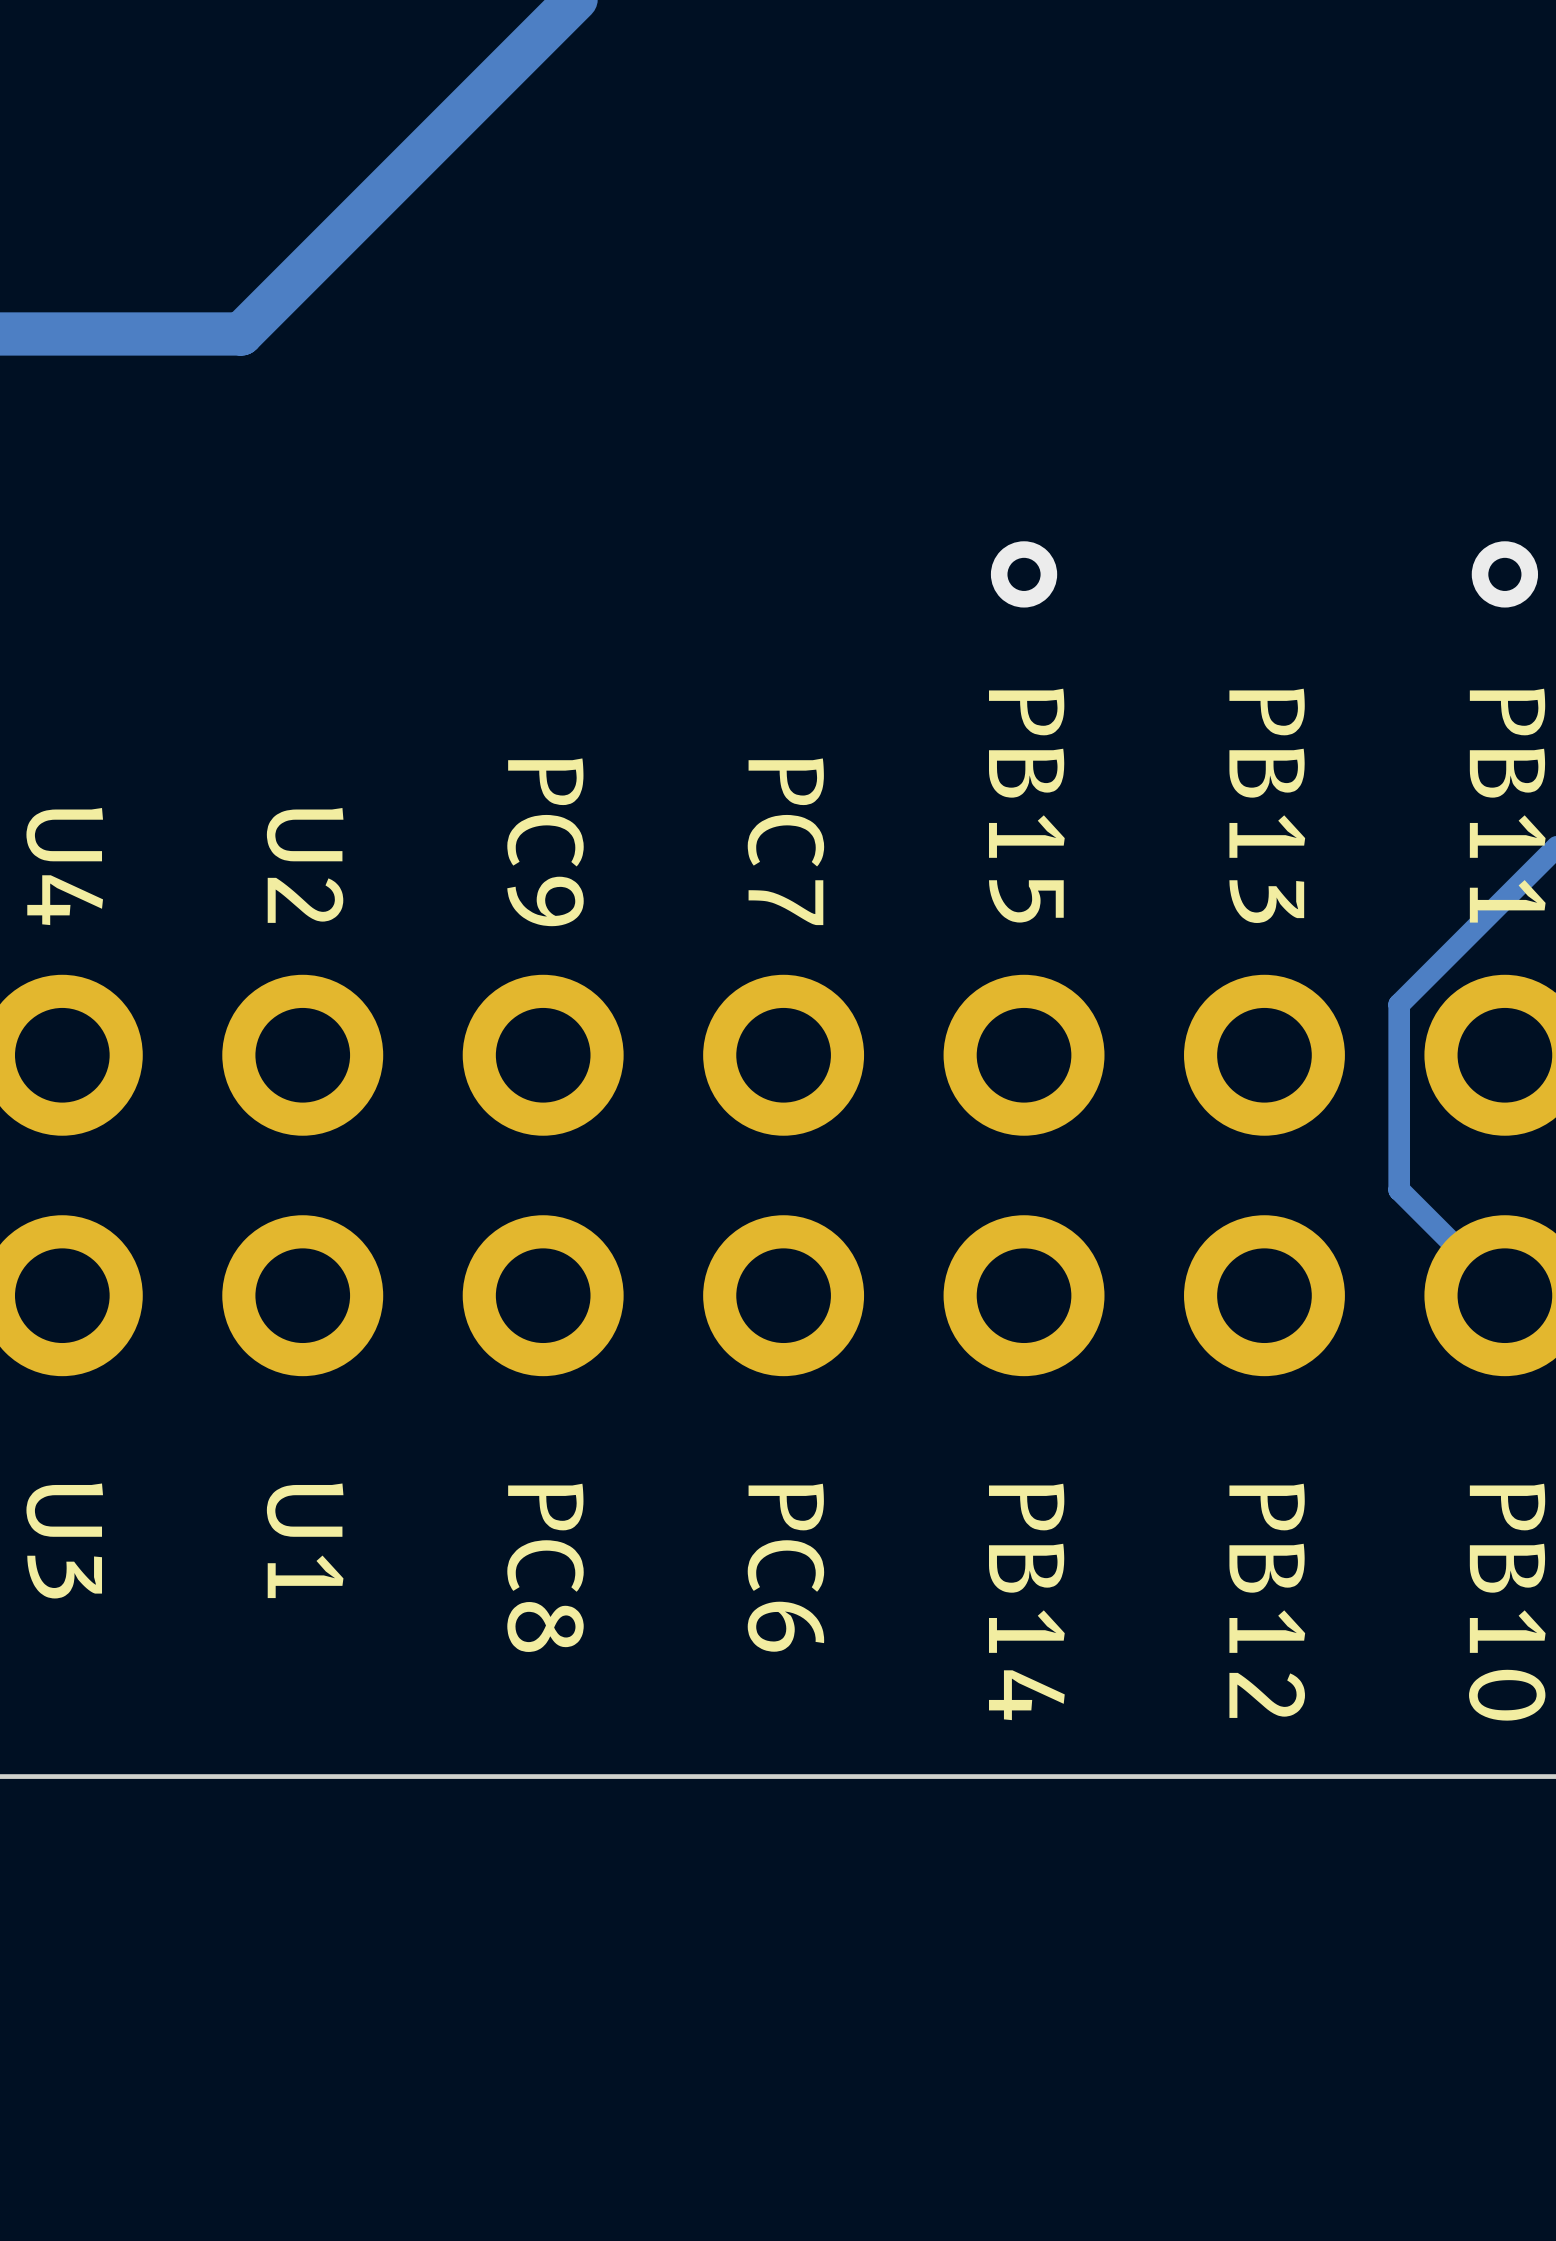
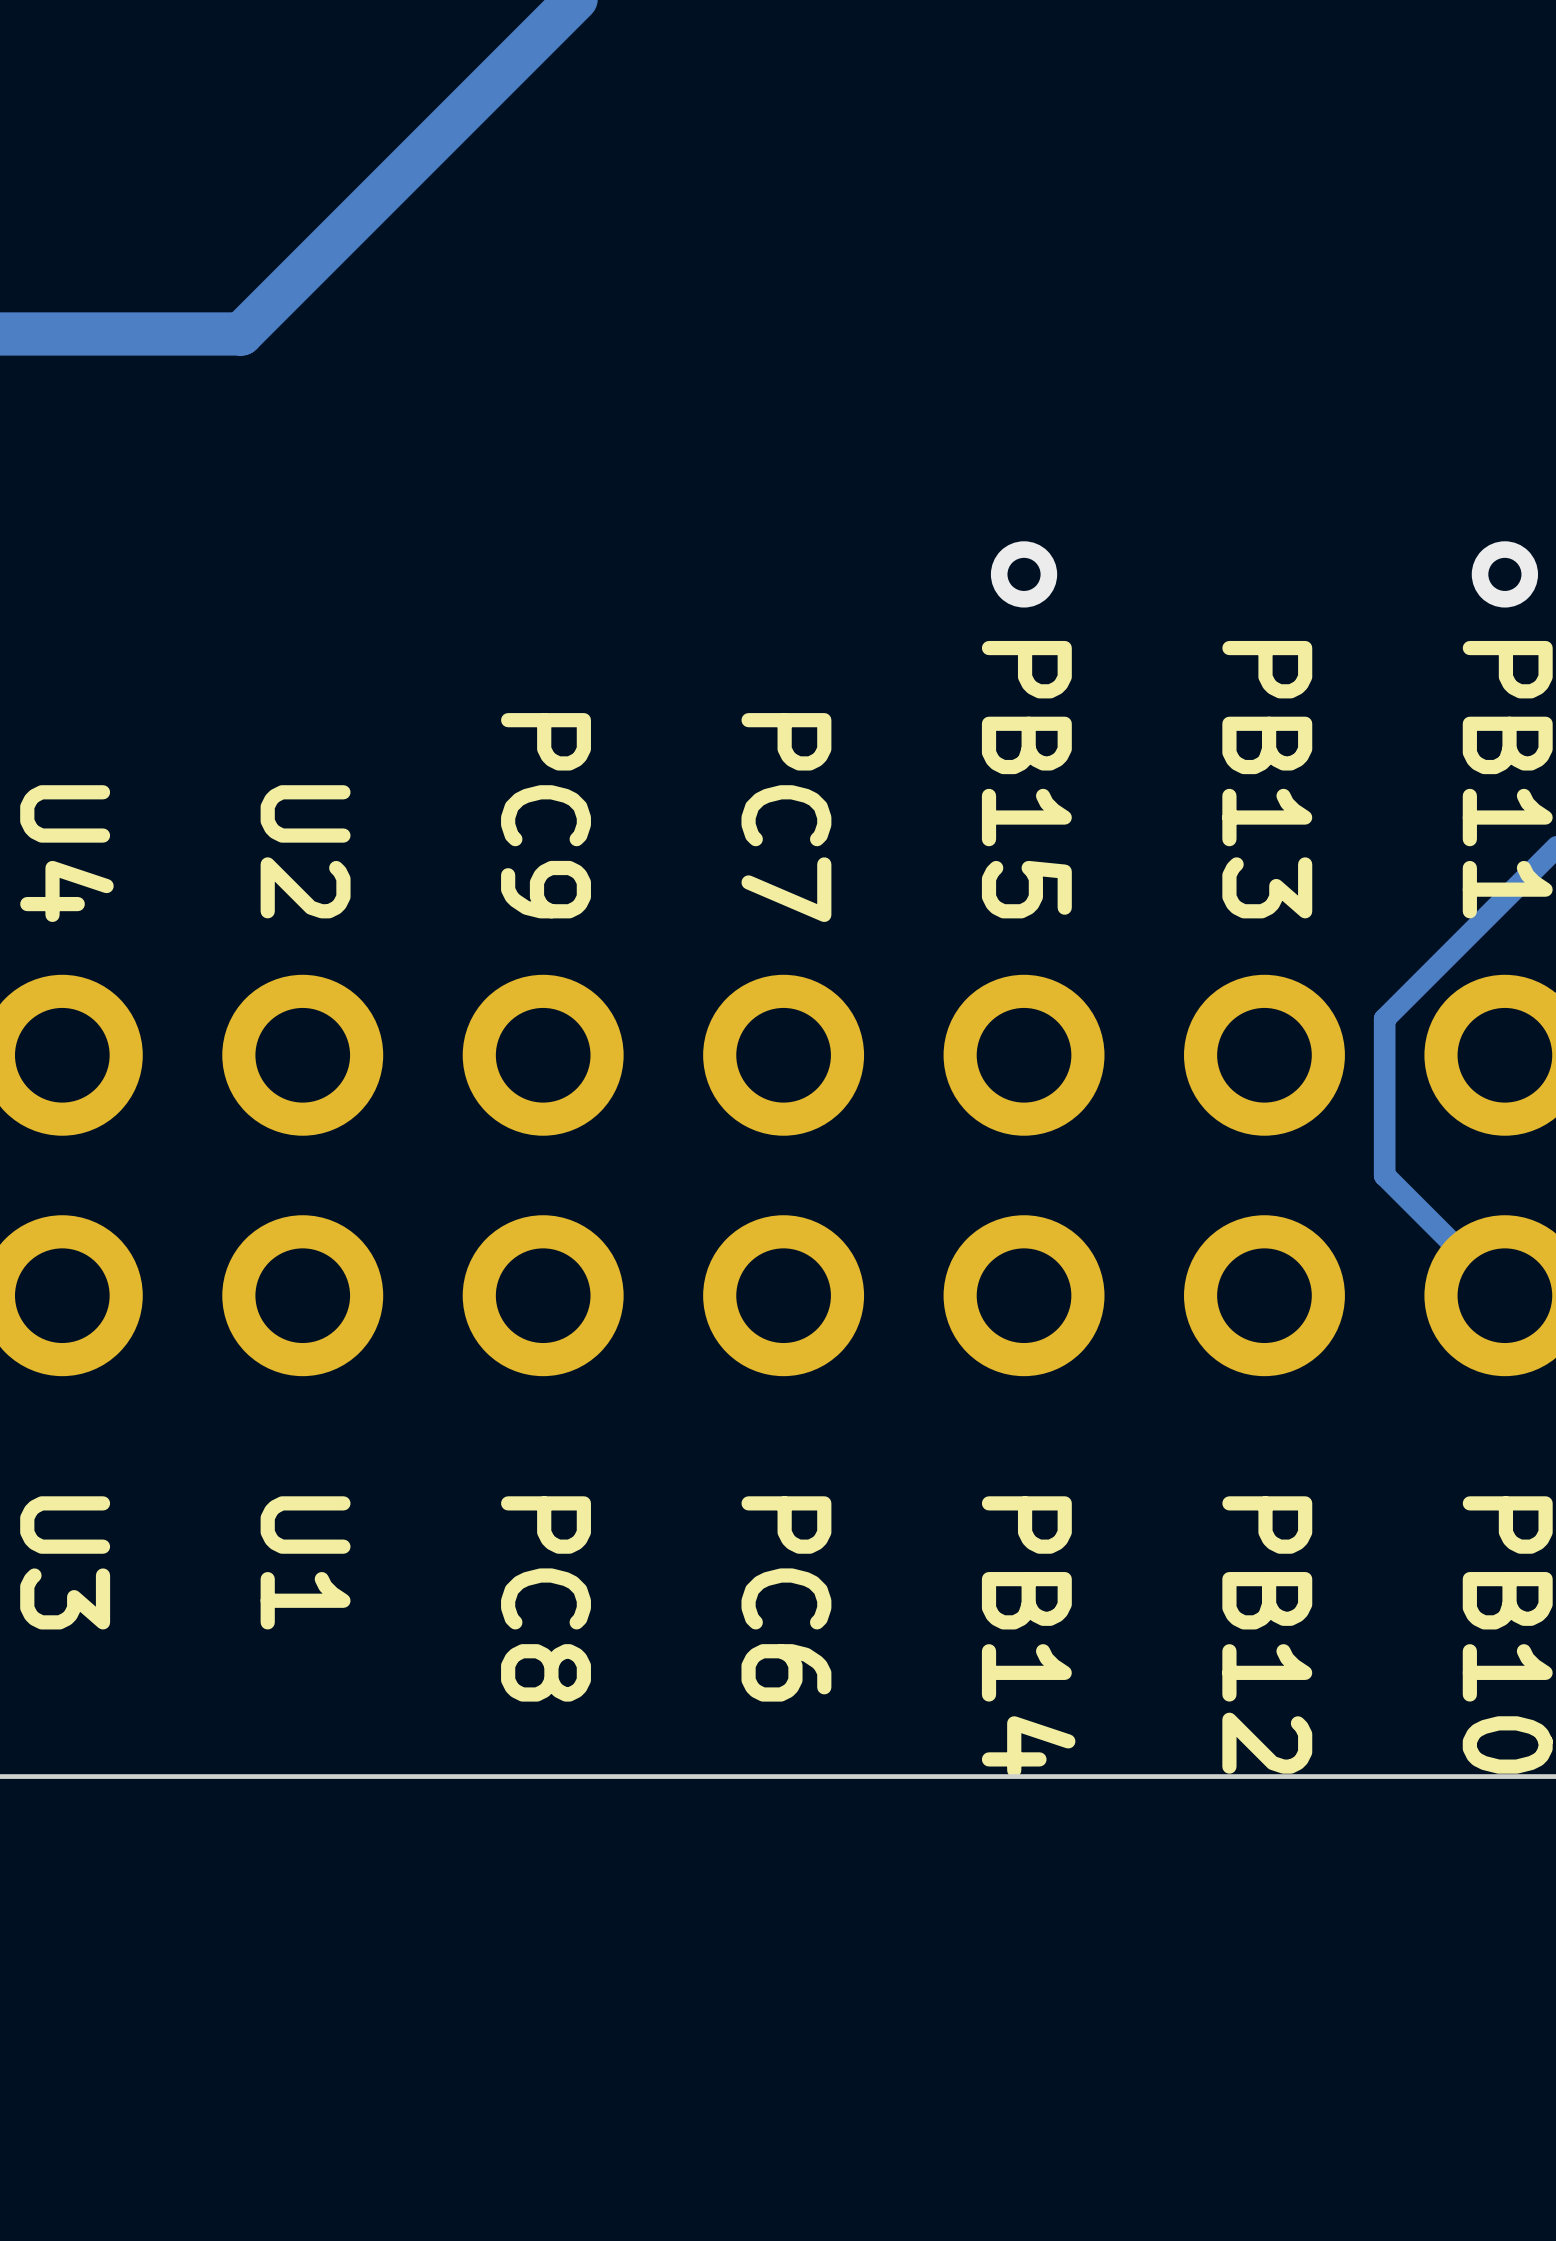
track: (1399, 1004) (1399, 1189) -> (1399, 1004) (1384, 1019) (1384, 1175) (1399, 1189)

